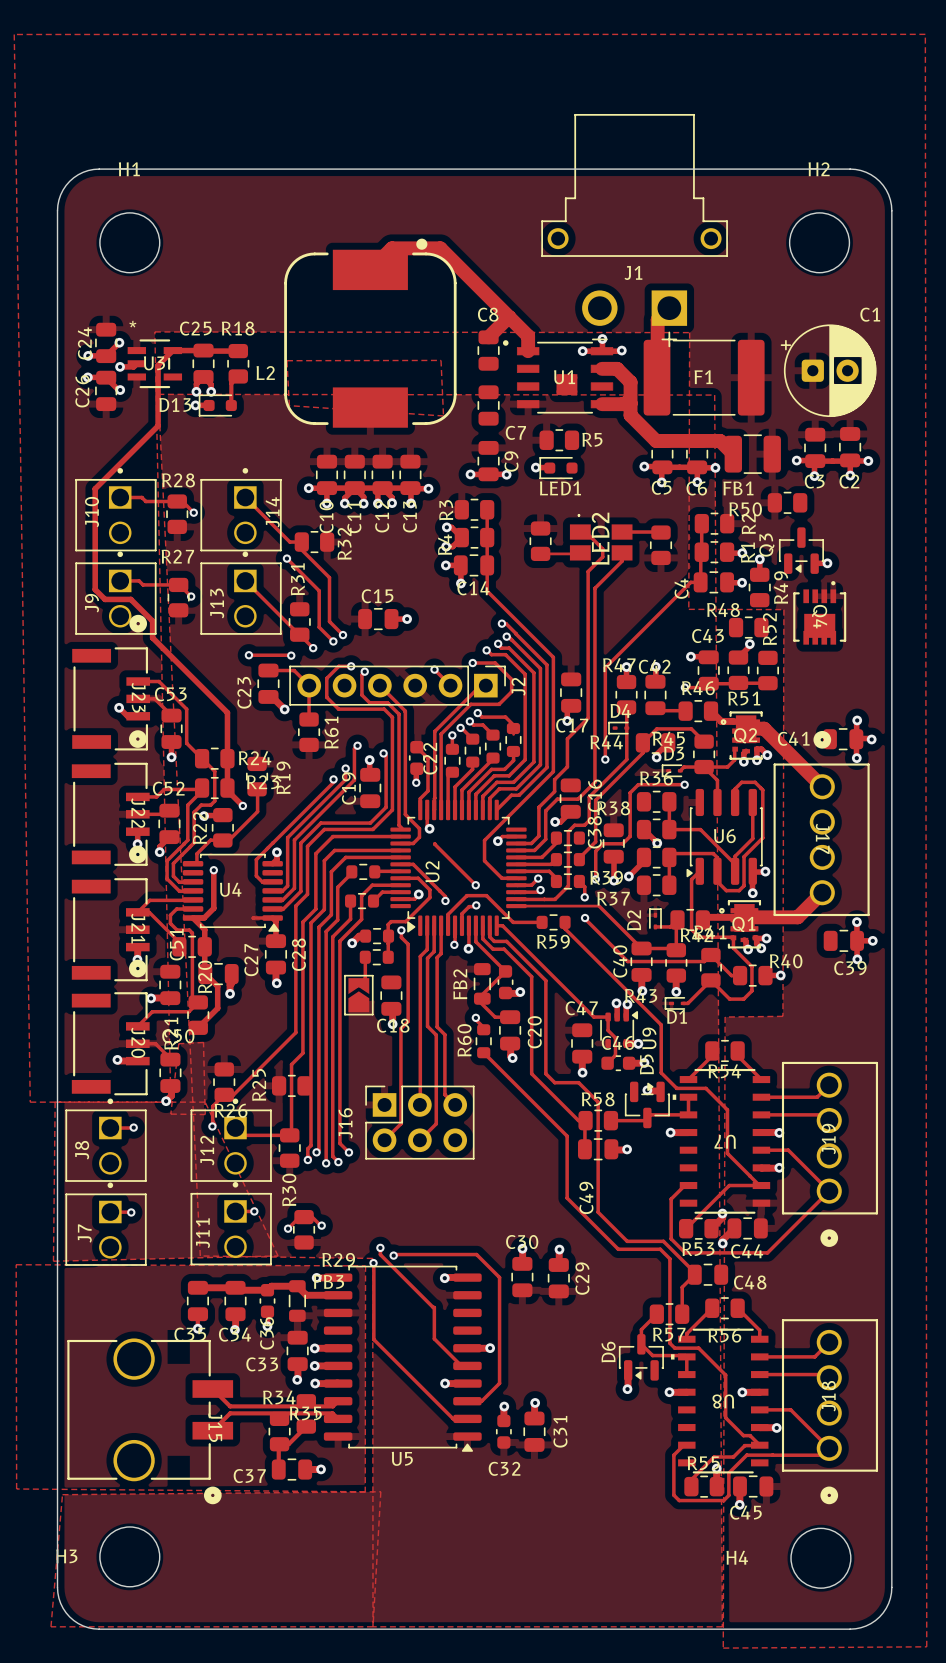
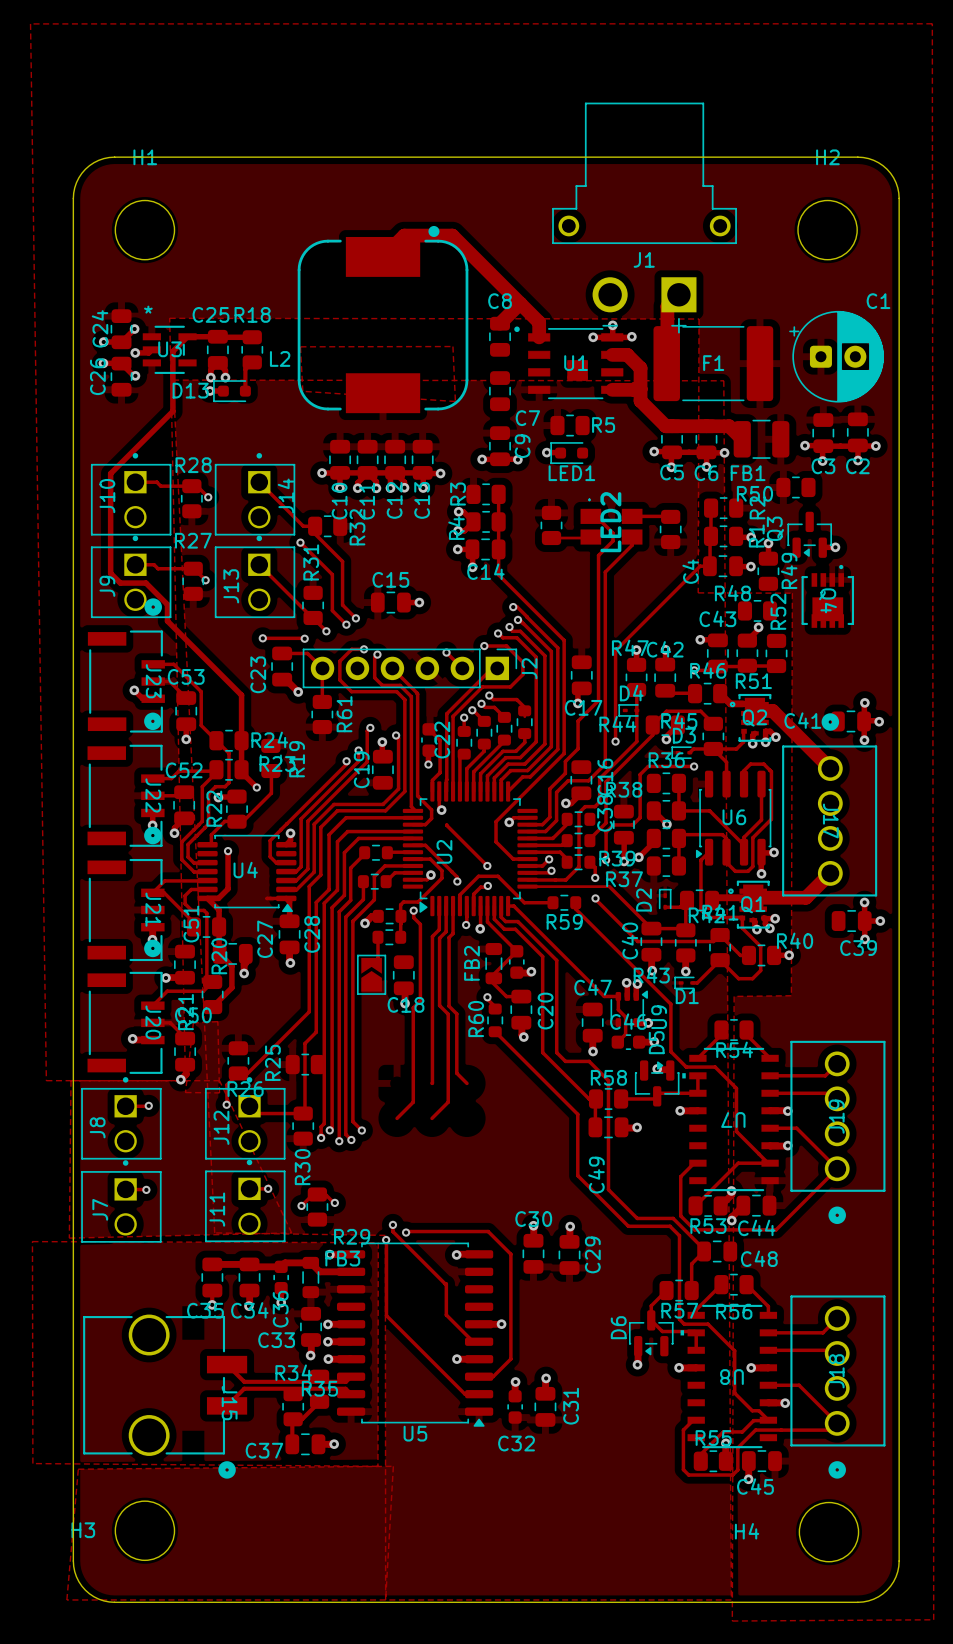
J16: (419, 1122) -> none

